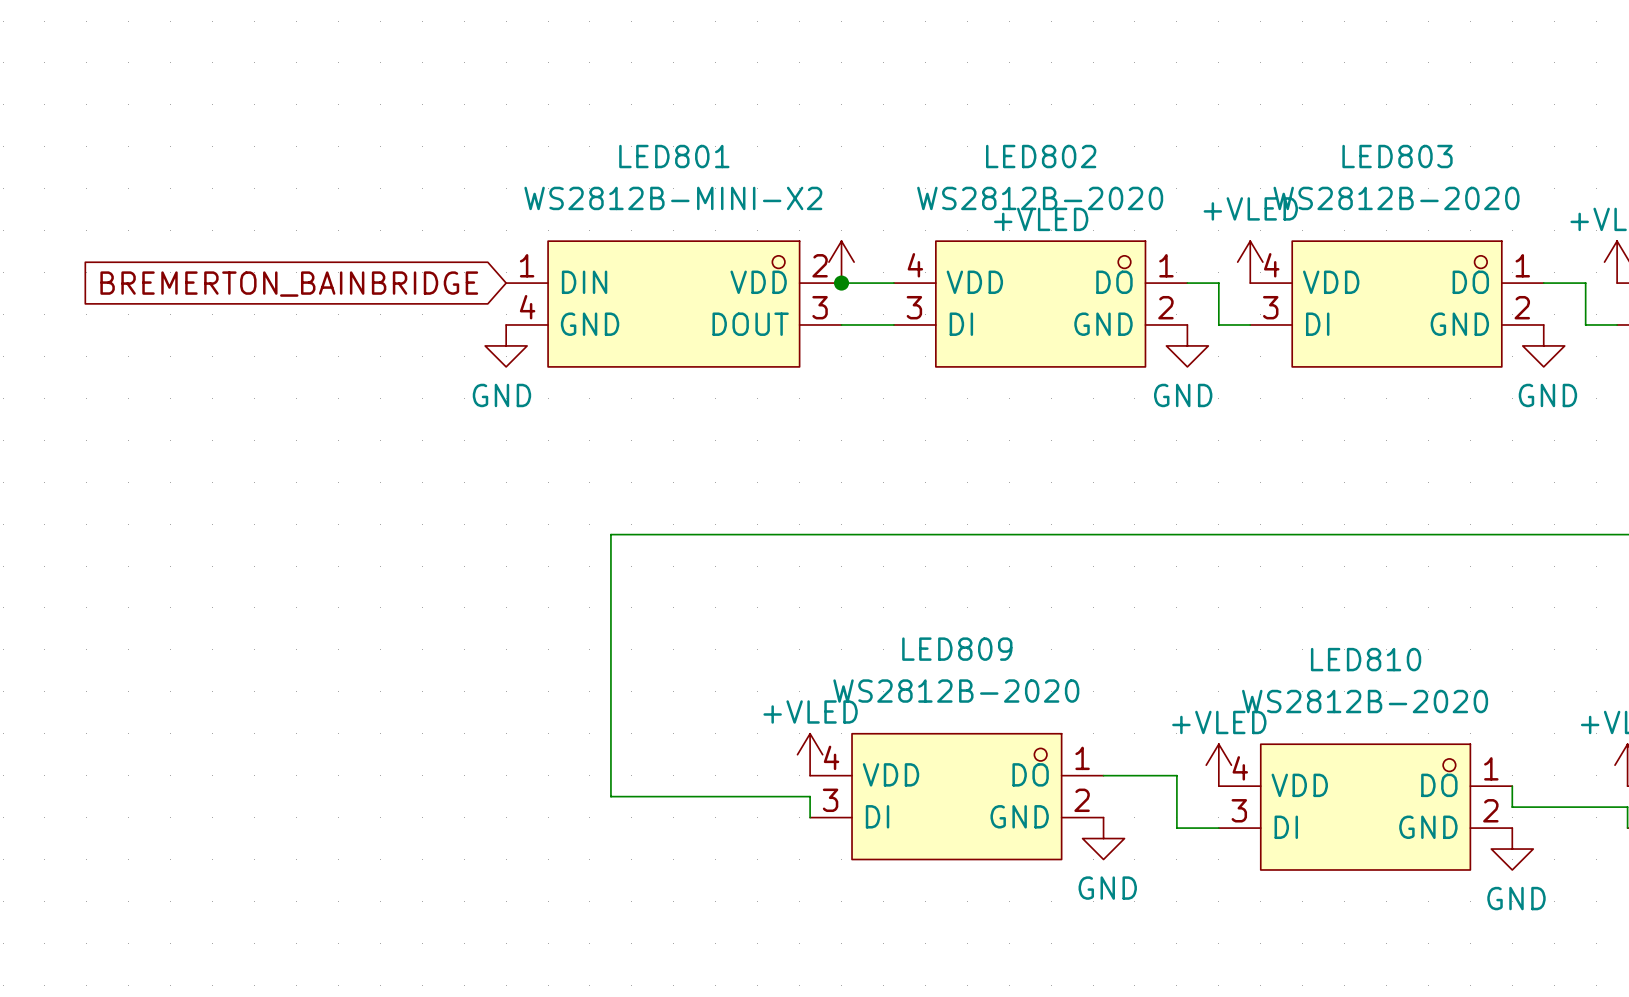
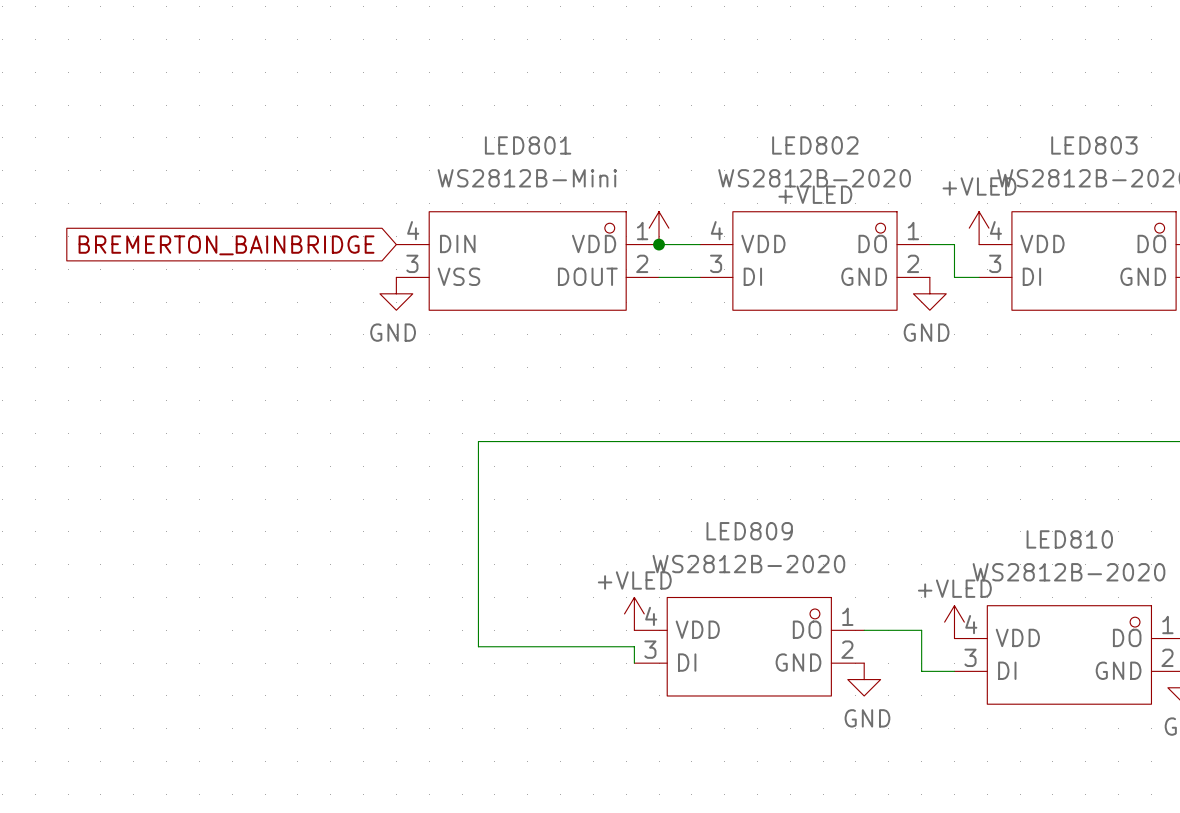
LED801 value: WS2812B-MINI-X2 (673, 198) -> WS2812B-Mini (527, 178)
LED801 pin number: 1 (527, 265) -> 4 (413, 230)
LED801 pin number: 2 (820, 265) -> 1 (642, 231)
LED801 pin number: 4 (527, 307) -> 3 (412, 263)
LED801 pin number: 3 (820, 307) -> 2 (642, 263)
LED801 pin name: GND (590, 324) -> VSS (458, 276)

